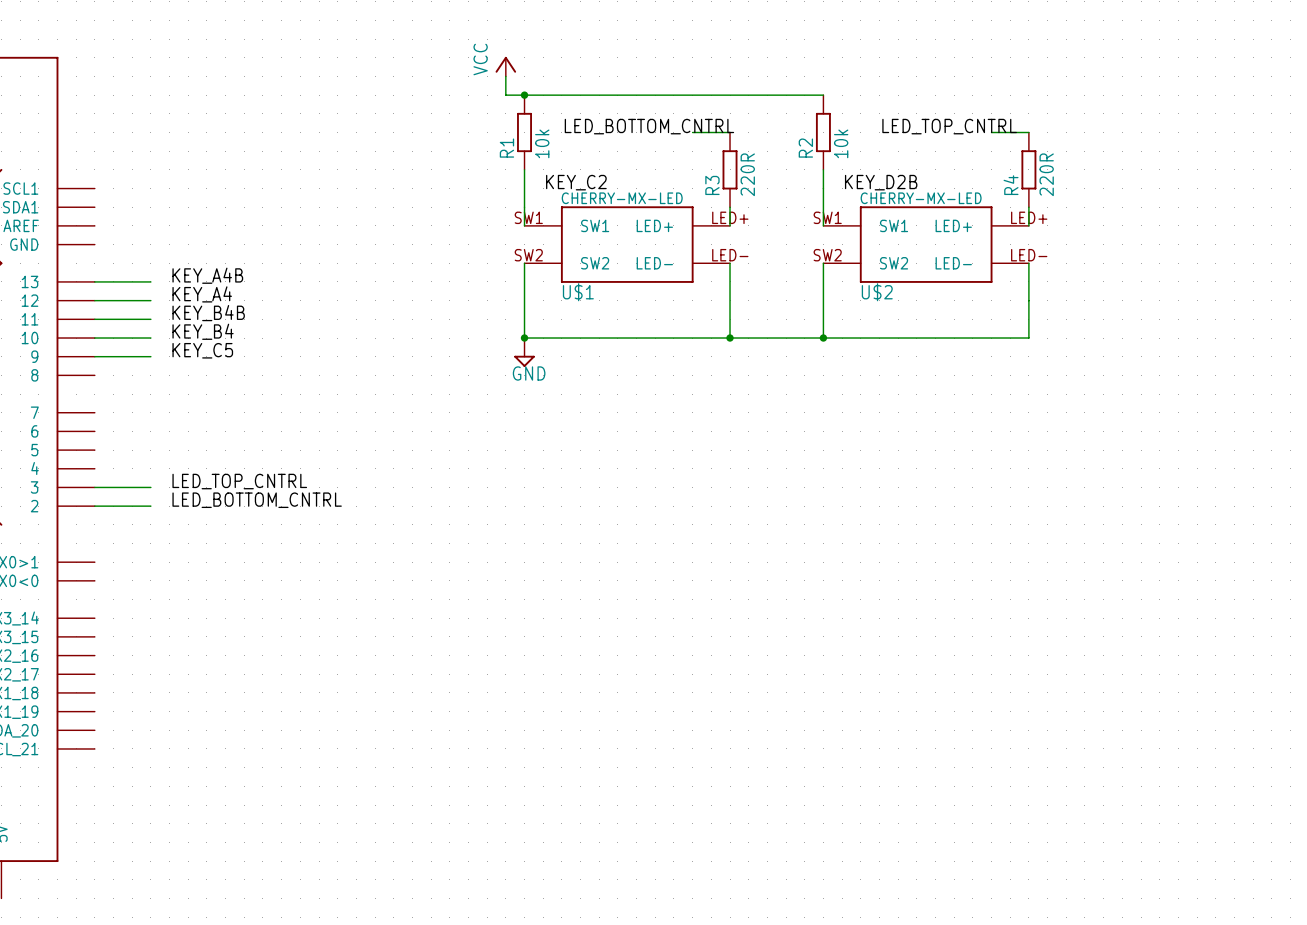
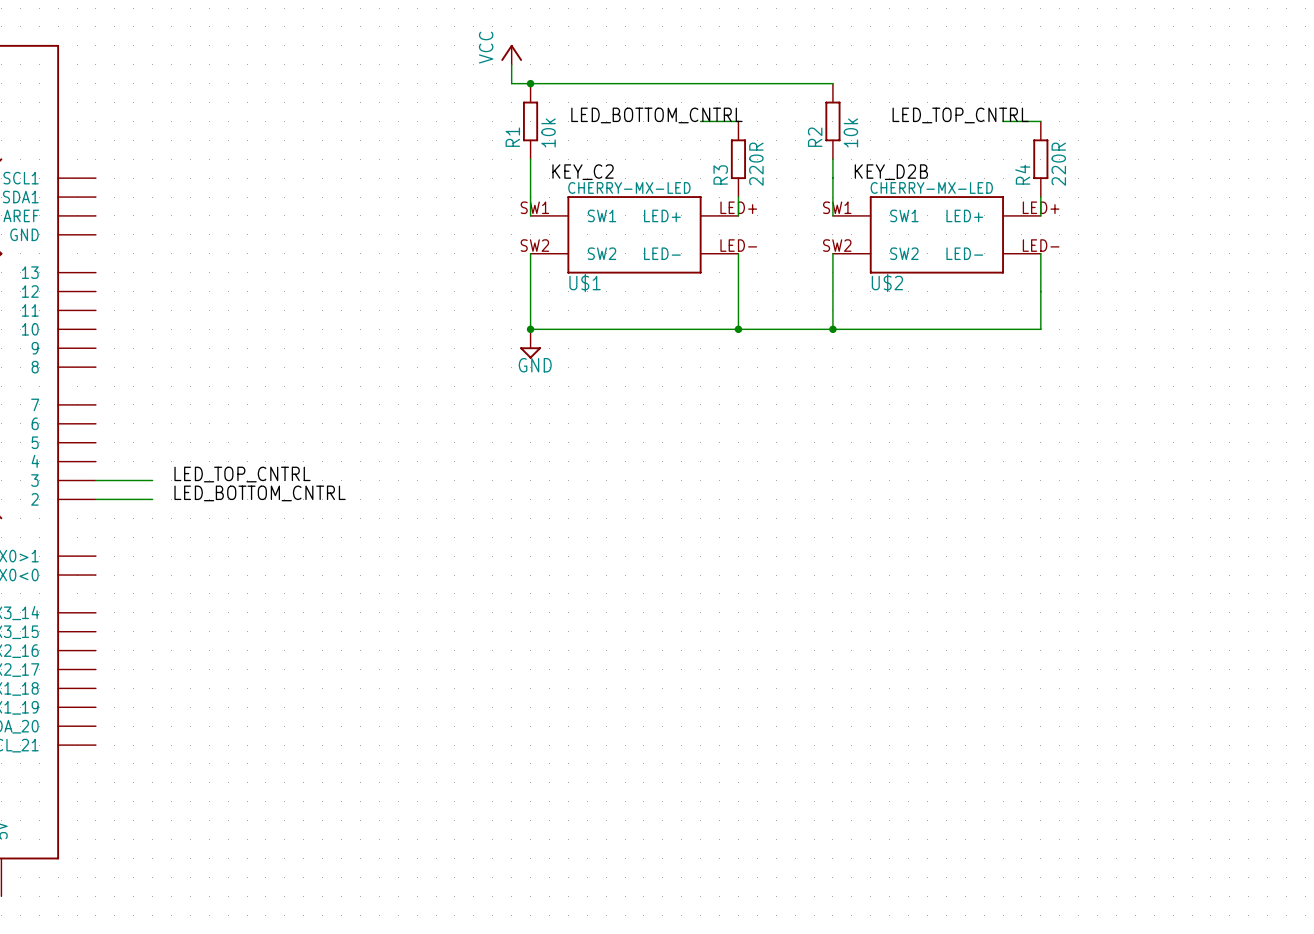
label: KEY_A4B (207, 275) -> none
wire: (94, 281) (150, 281) -> none
label: KEY_A4 (202, 294) -> none
wire: (94, 300) (150, 300) -> none
label: KEY_B4B (208, 313) -> none
wire: (94, 319) (150, 319) -> none
label: KEY_B4 (203, 331) -> none
wire: (94, 338) (150, 338) -> none
label: KEY_C5 (202, 350) -> none
wire: (94, 356) (150, 356) -> none

